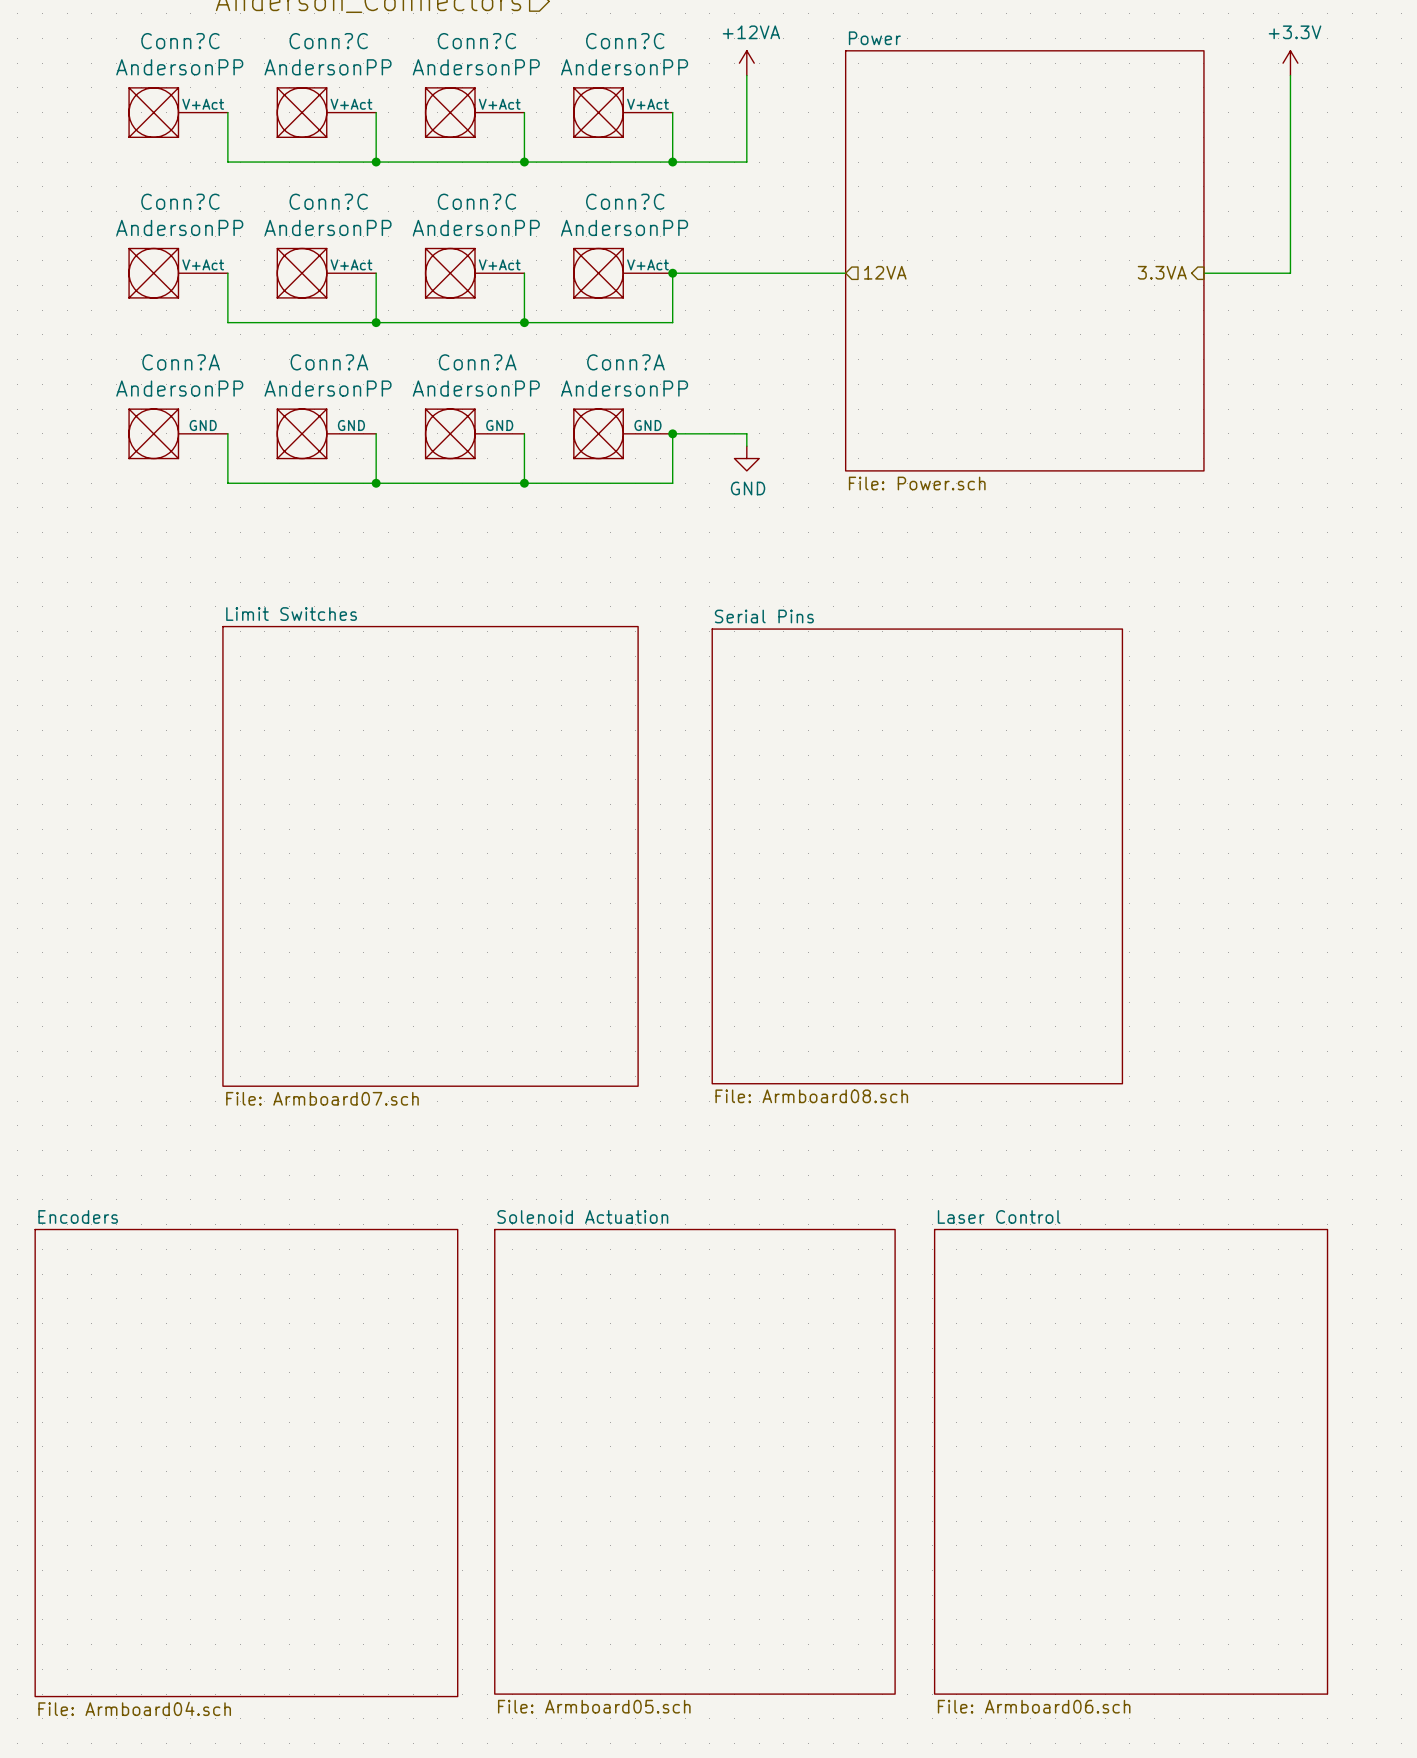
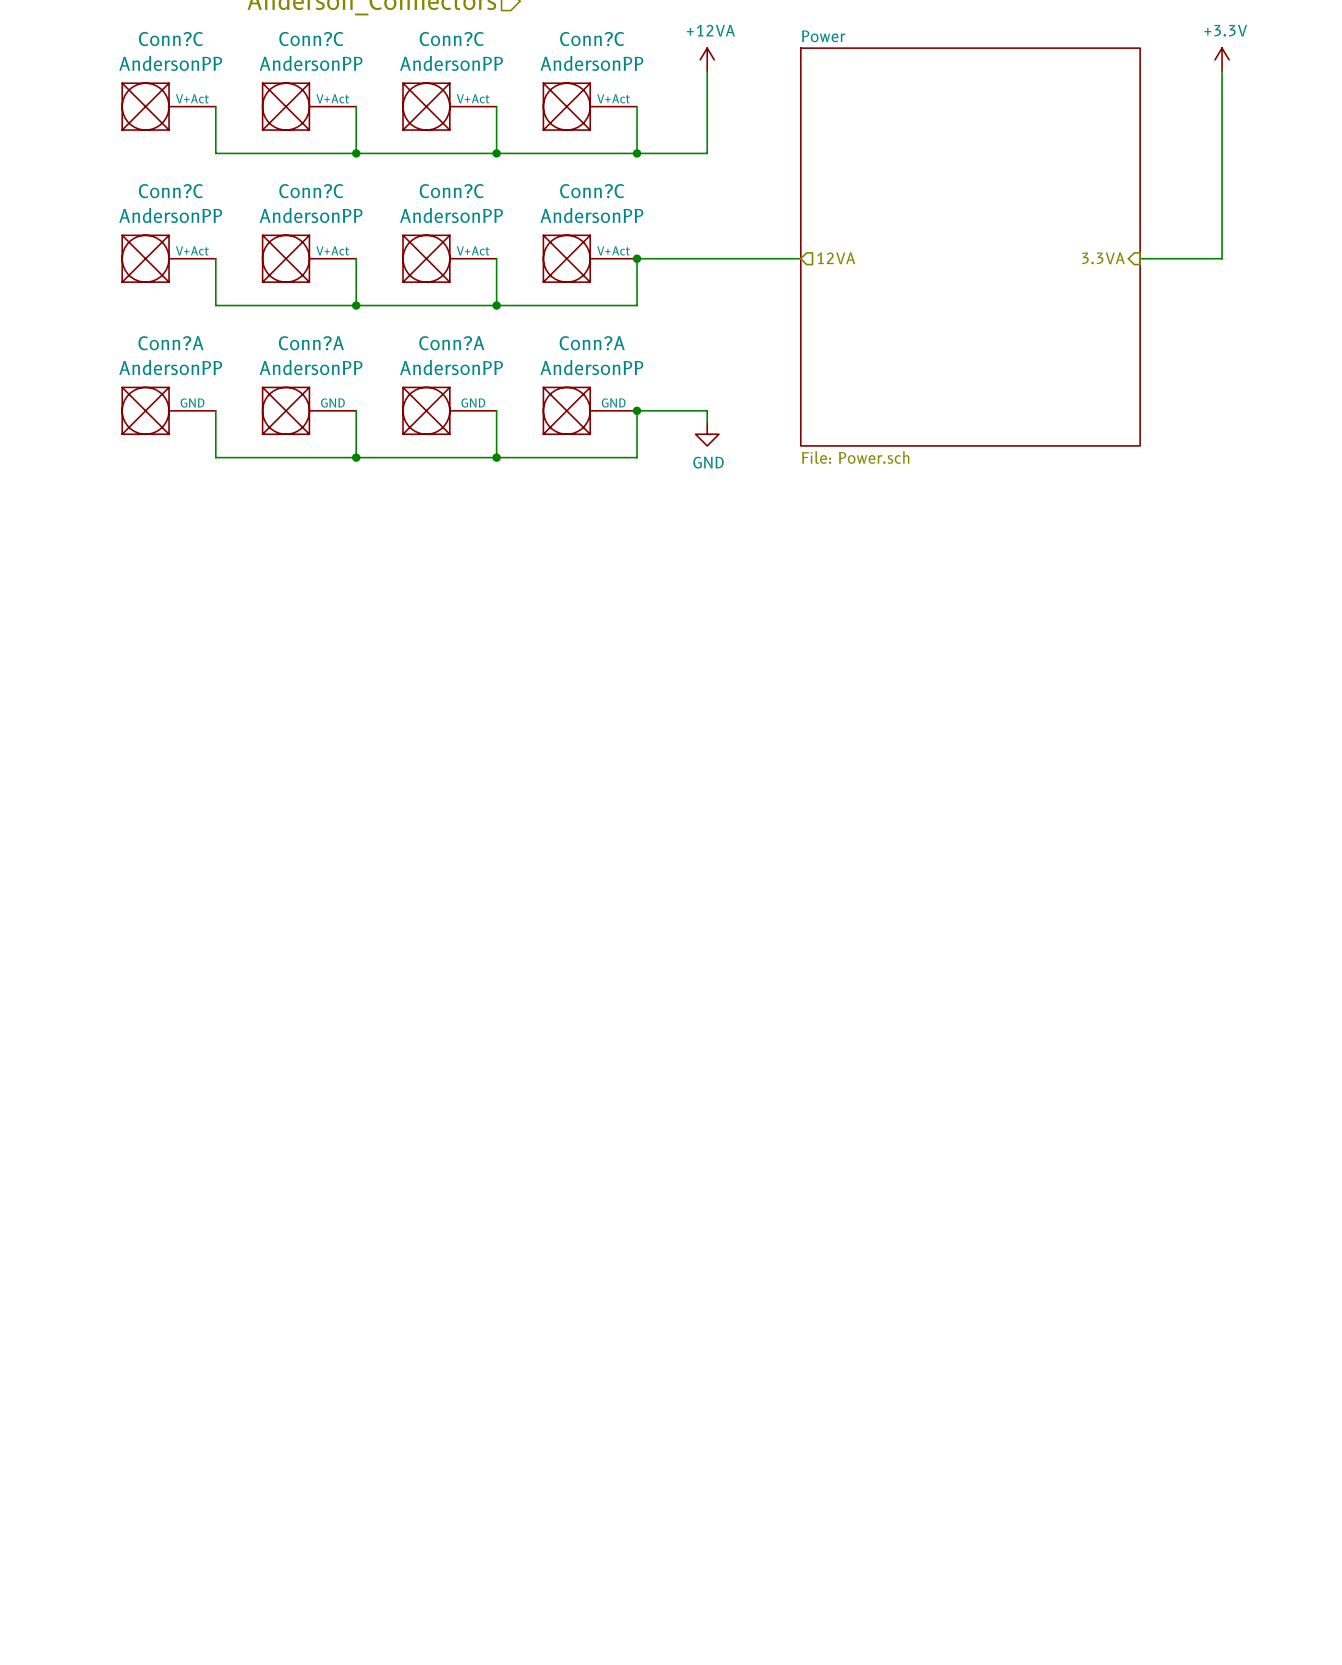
sheet Limit Switches: File: Armboard07.sch (430, 856) -> none
sheet Serial Pins: File: Armboard08.sch (917, 856) -> none
sheet Solenoid Actuation: File: Armboard05.sch (694, 1461) -> none
sheet Laser Control: File: Armboard06.sch (1131, 1461) -> none
sheet Encoders: File: Armboard04.sch (246, 1463) -> none

